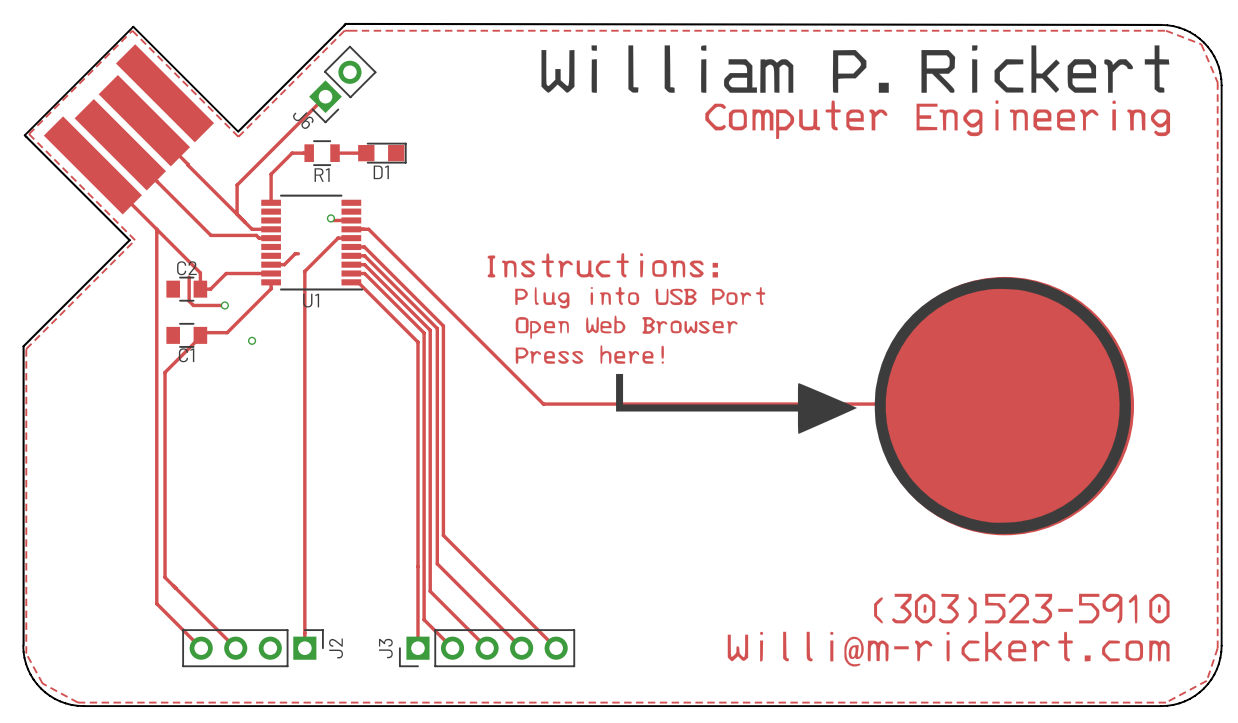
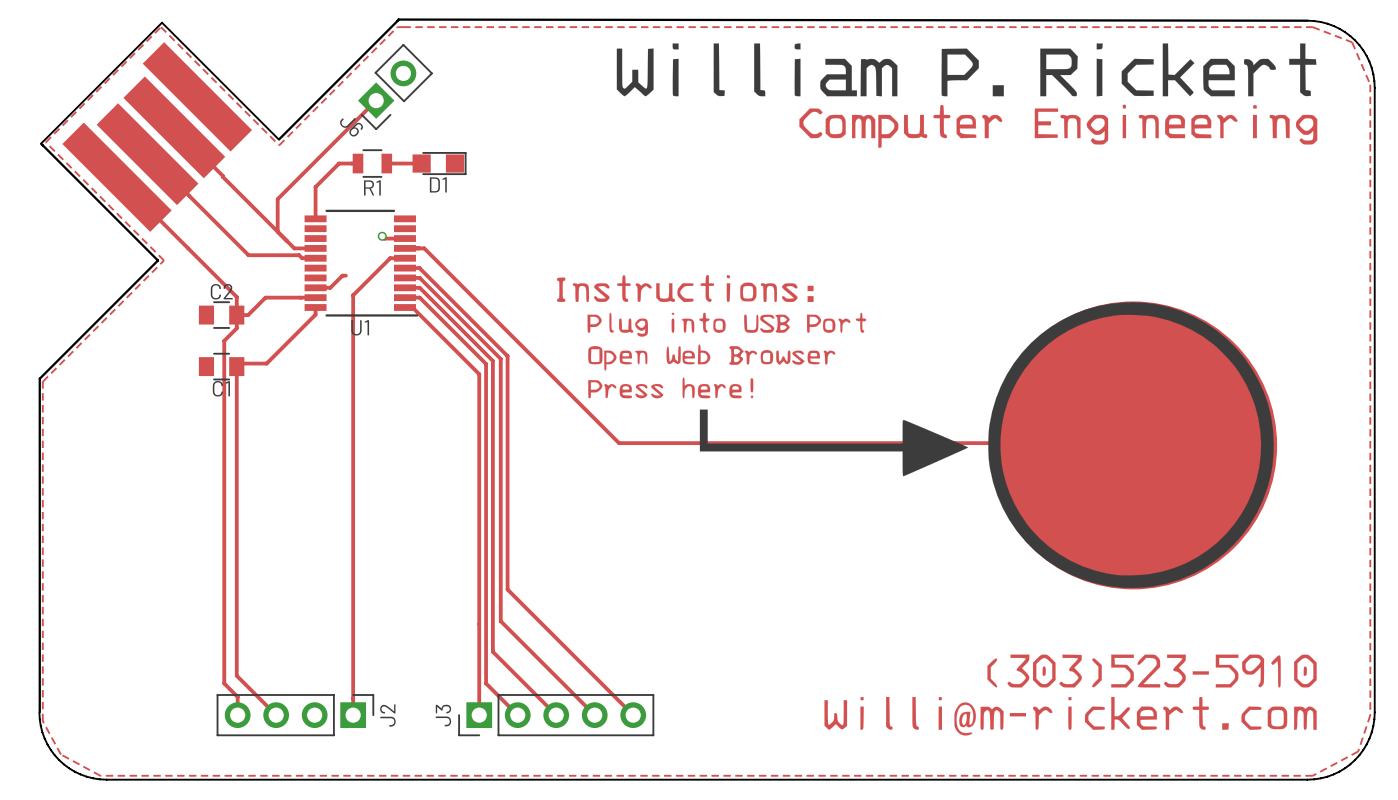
track: (156, 229) (156, 603) (201, 648) -> (236, 315) (236, 328) (224, 340) (224, 683) (237, 696) (237, 715)
track: (189, 277) (189, 301) (193, 305) (224, 305) -> none
via: (224, 305) -> none
track: (200, 337) (165, 372) (165, 577) (200, 612) -> (236, 368) (236, 675)
via: (252, 340) -> none

